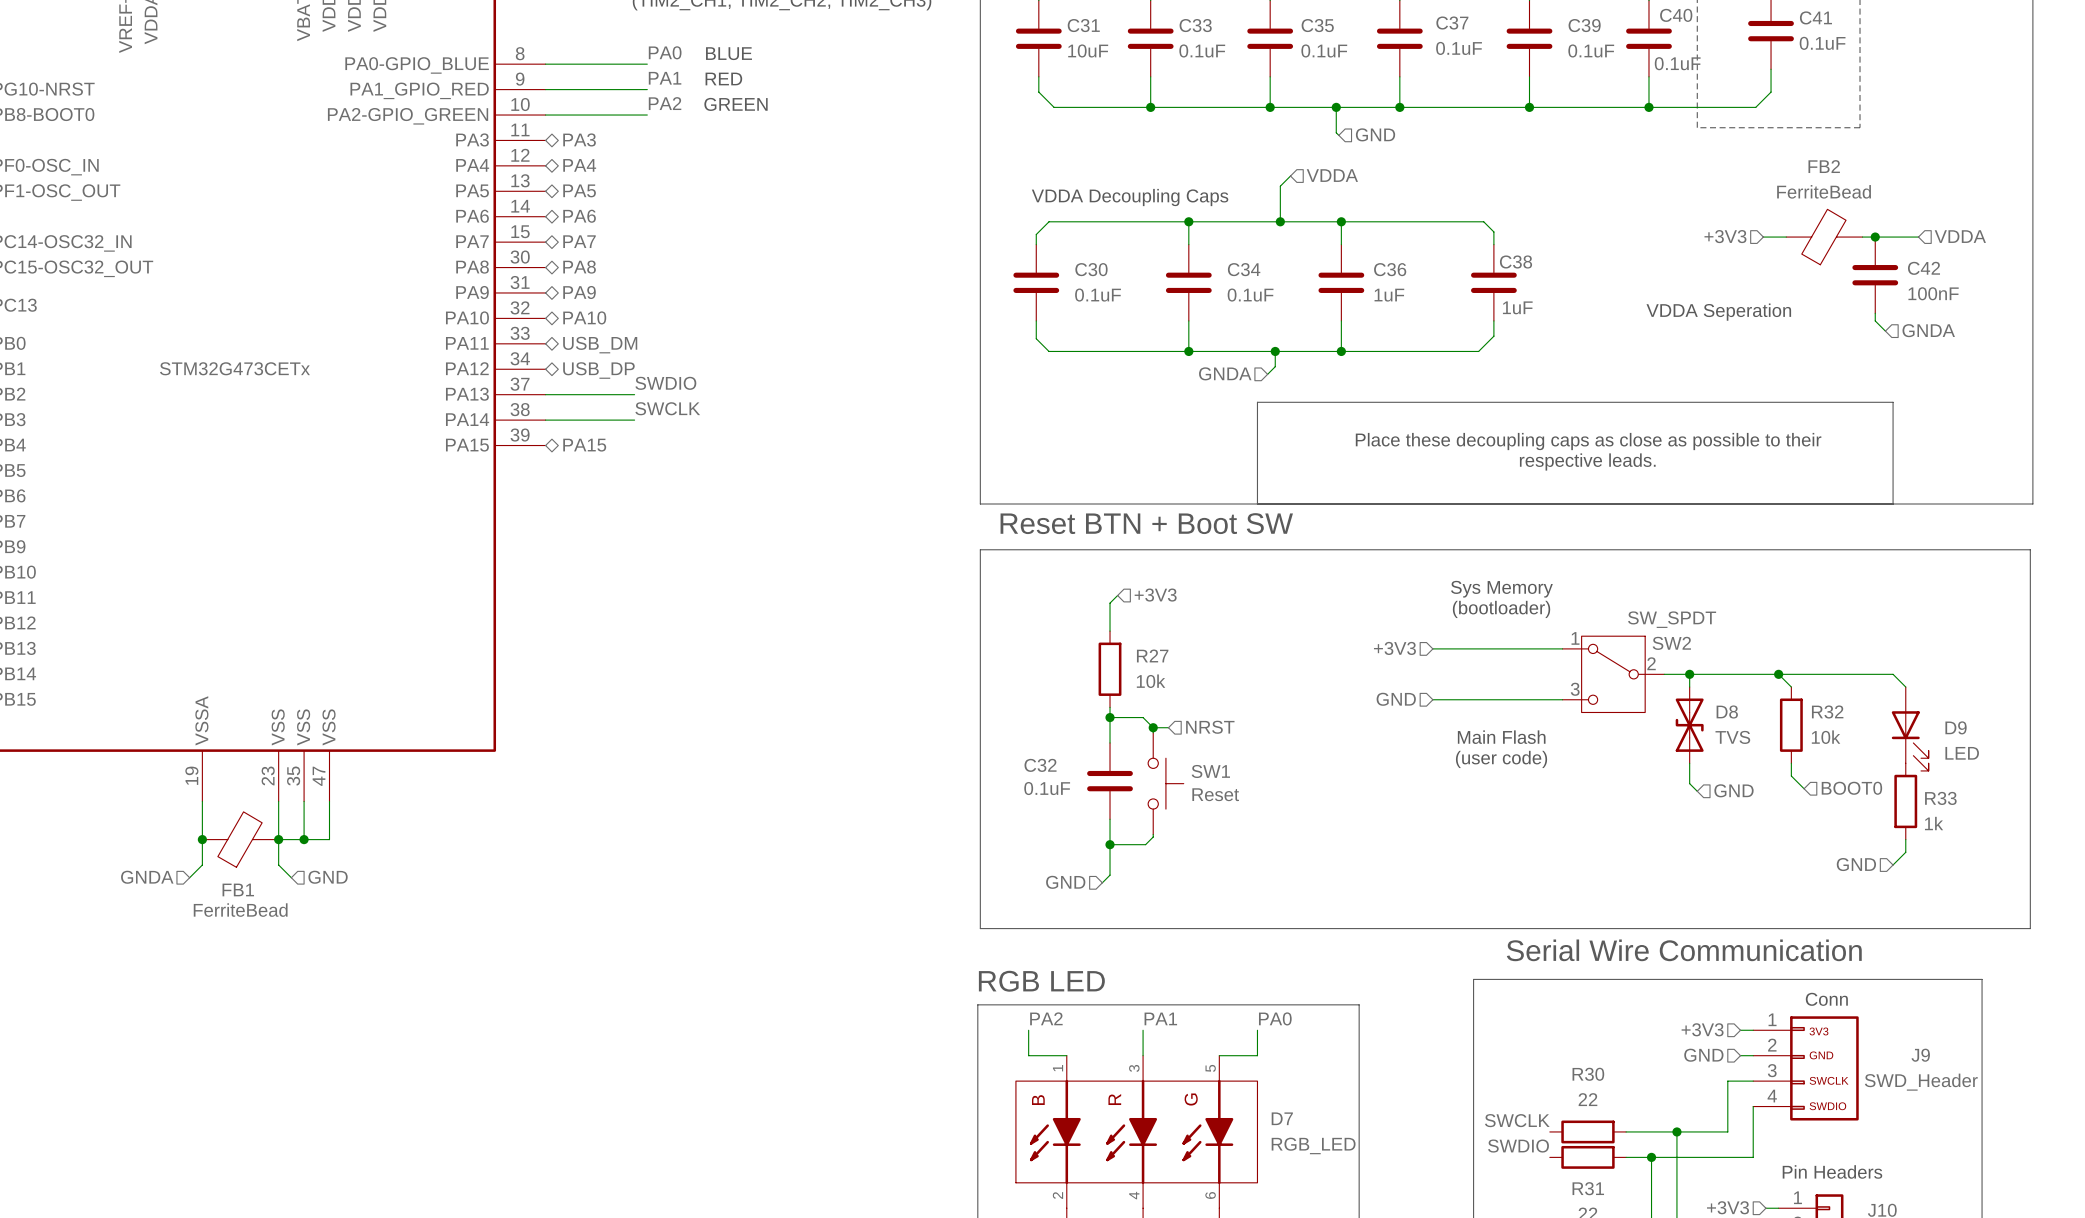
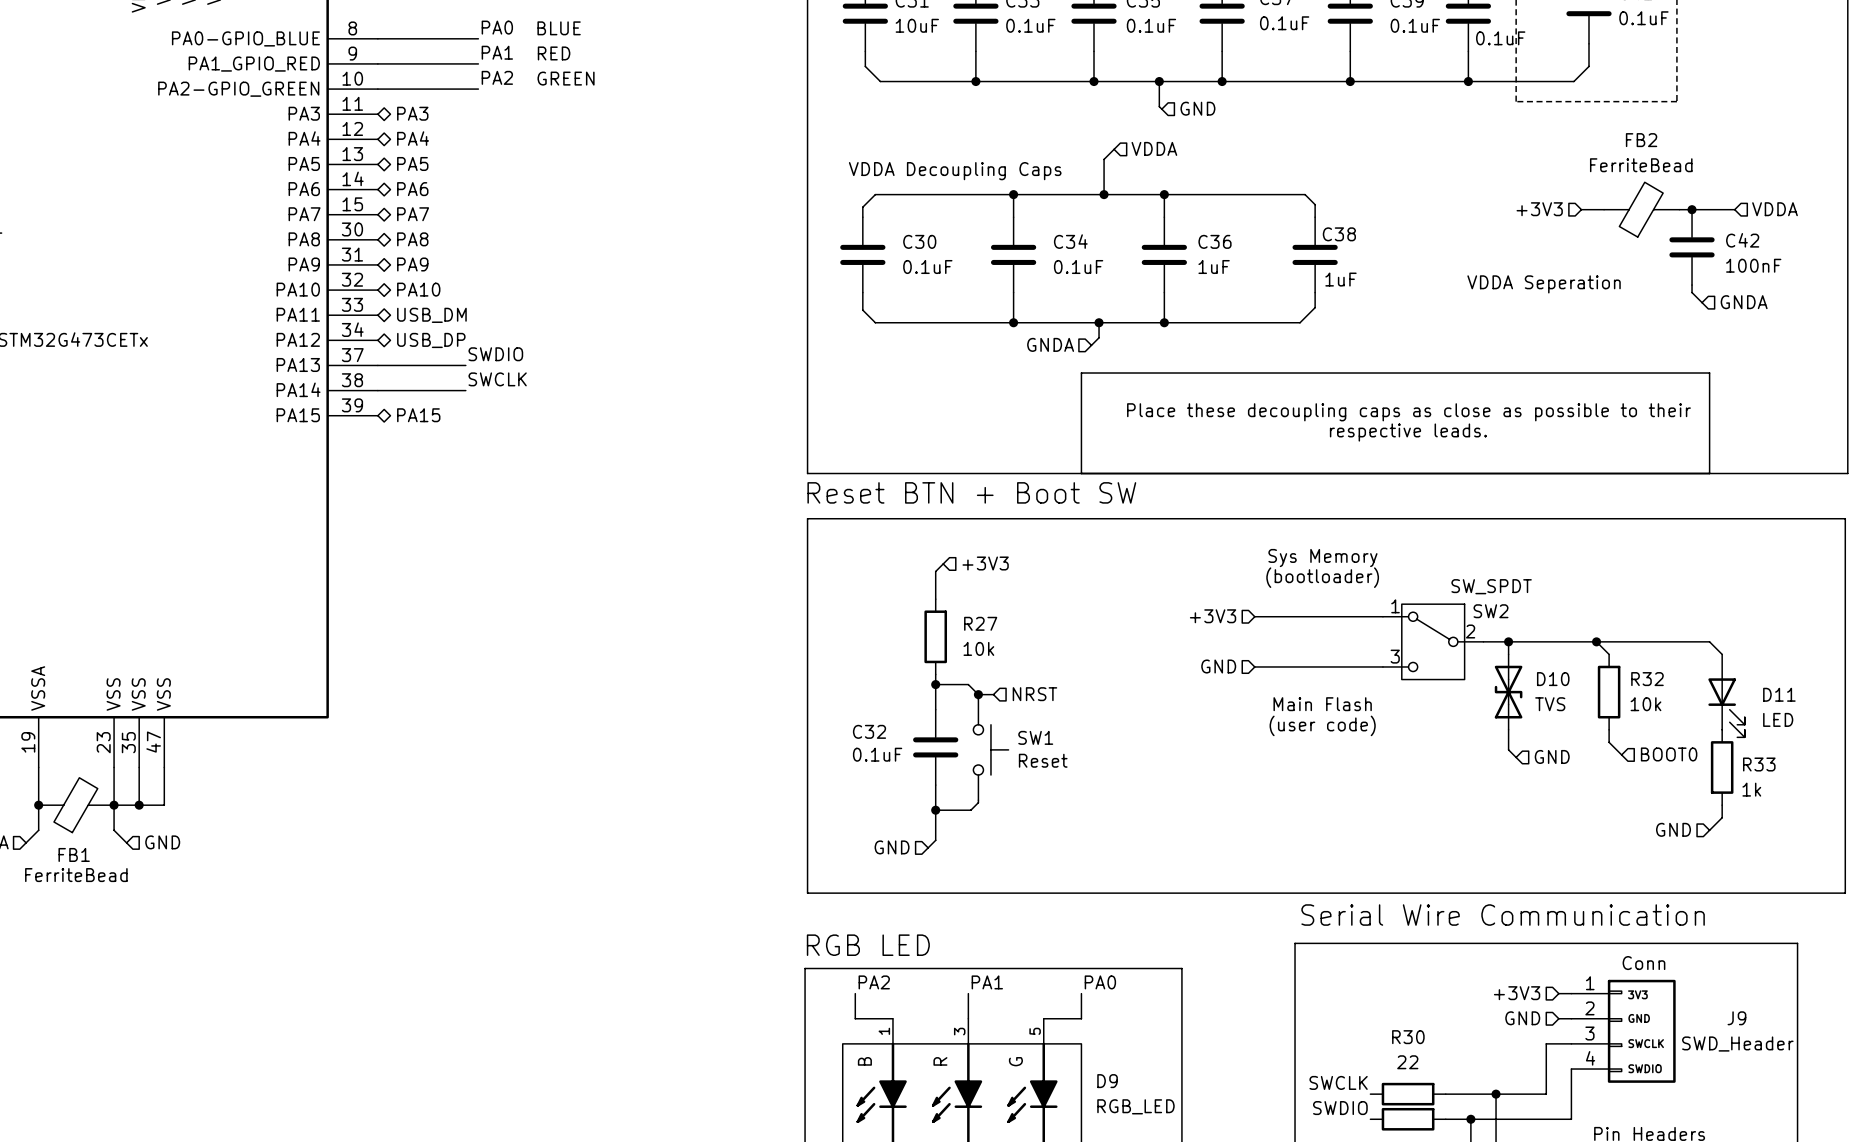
D8 name: D8 (1727, 711) -> D10 (1553, 679)
D9 name: D9 (1956, 727) -> D11 (1779, 694)
D7 name: D7 (1282, 1118) -> D9 (1107, 1081)

